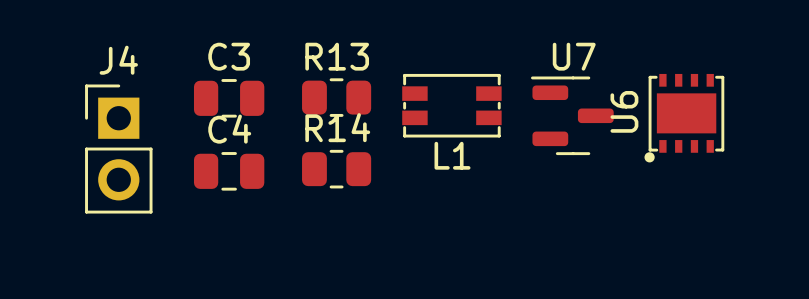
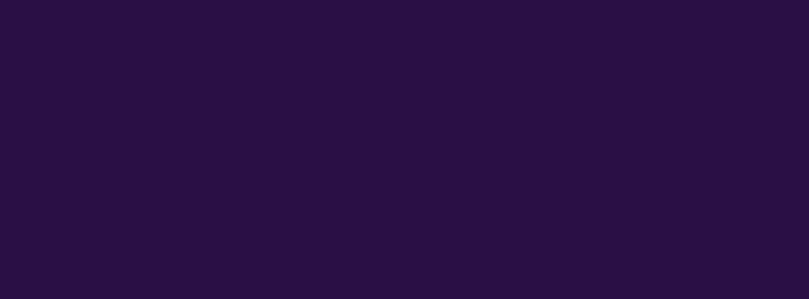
R13: (336, 97) -> none
C3: (229, 98) -> none
L1: (451, 105) -> none
U7: (572, 115) -> none
U6: (684, 118) -> none
J4: (118, 149) -> none
R14: (336, 169) -> none
C4: (229, 171) -> none

